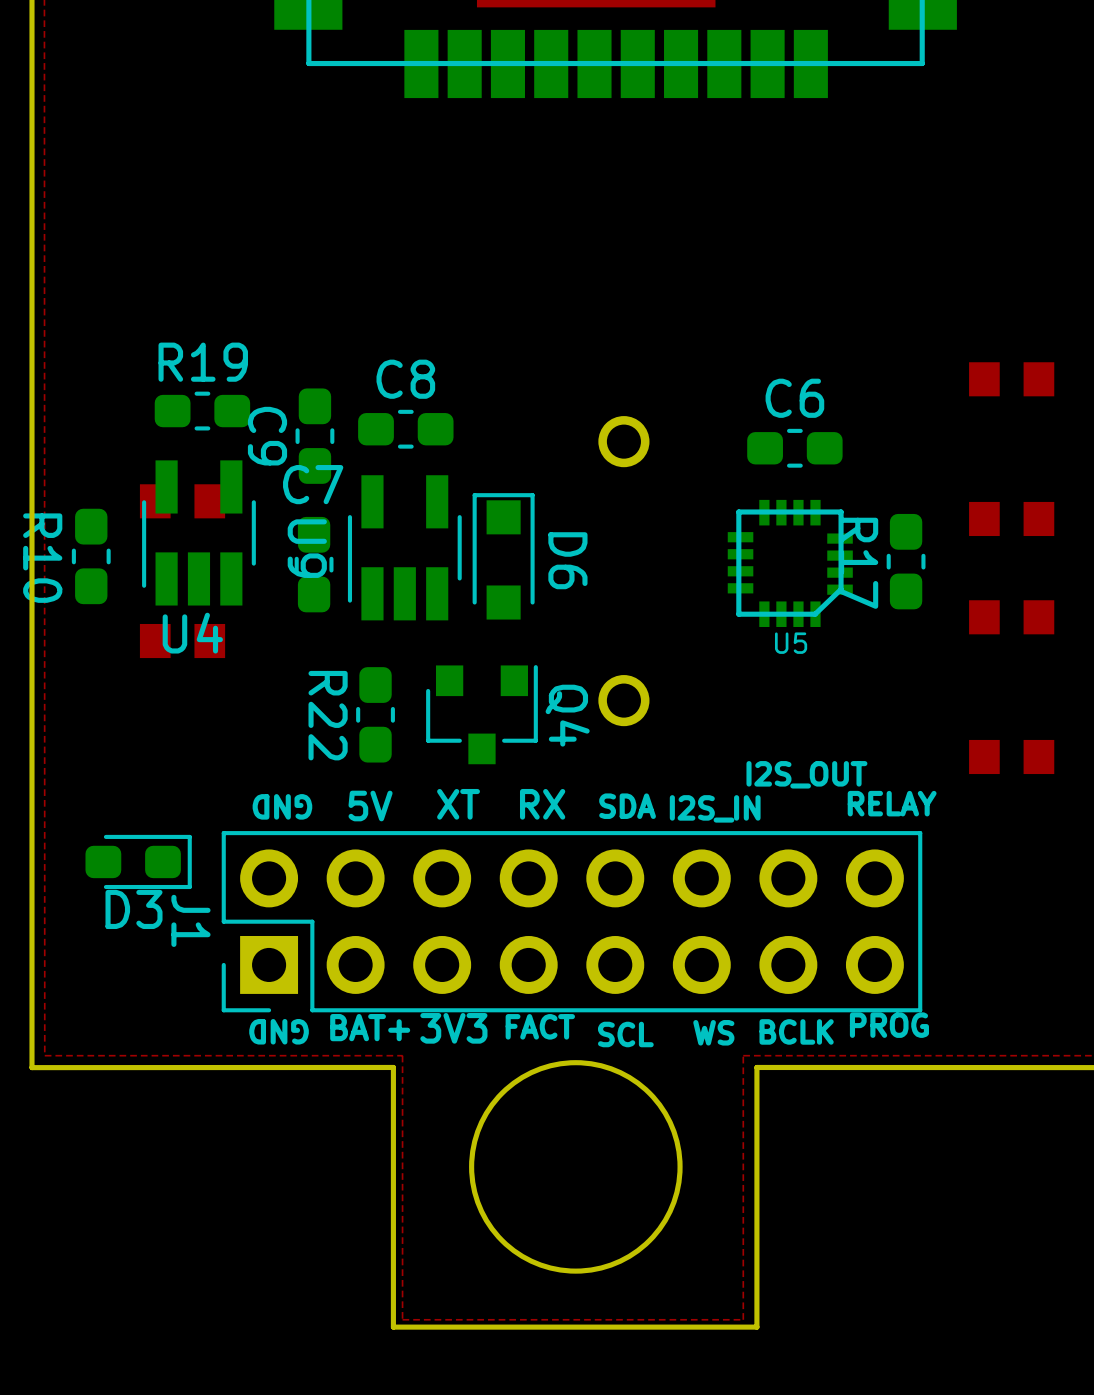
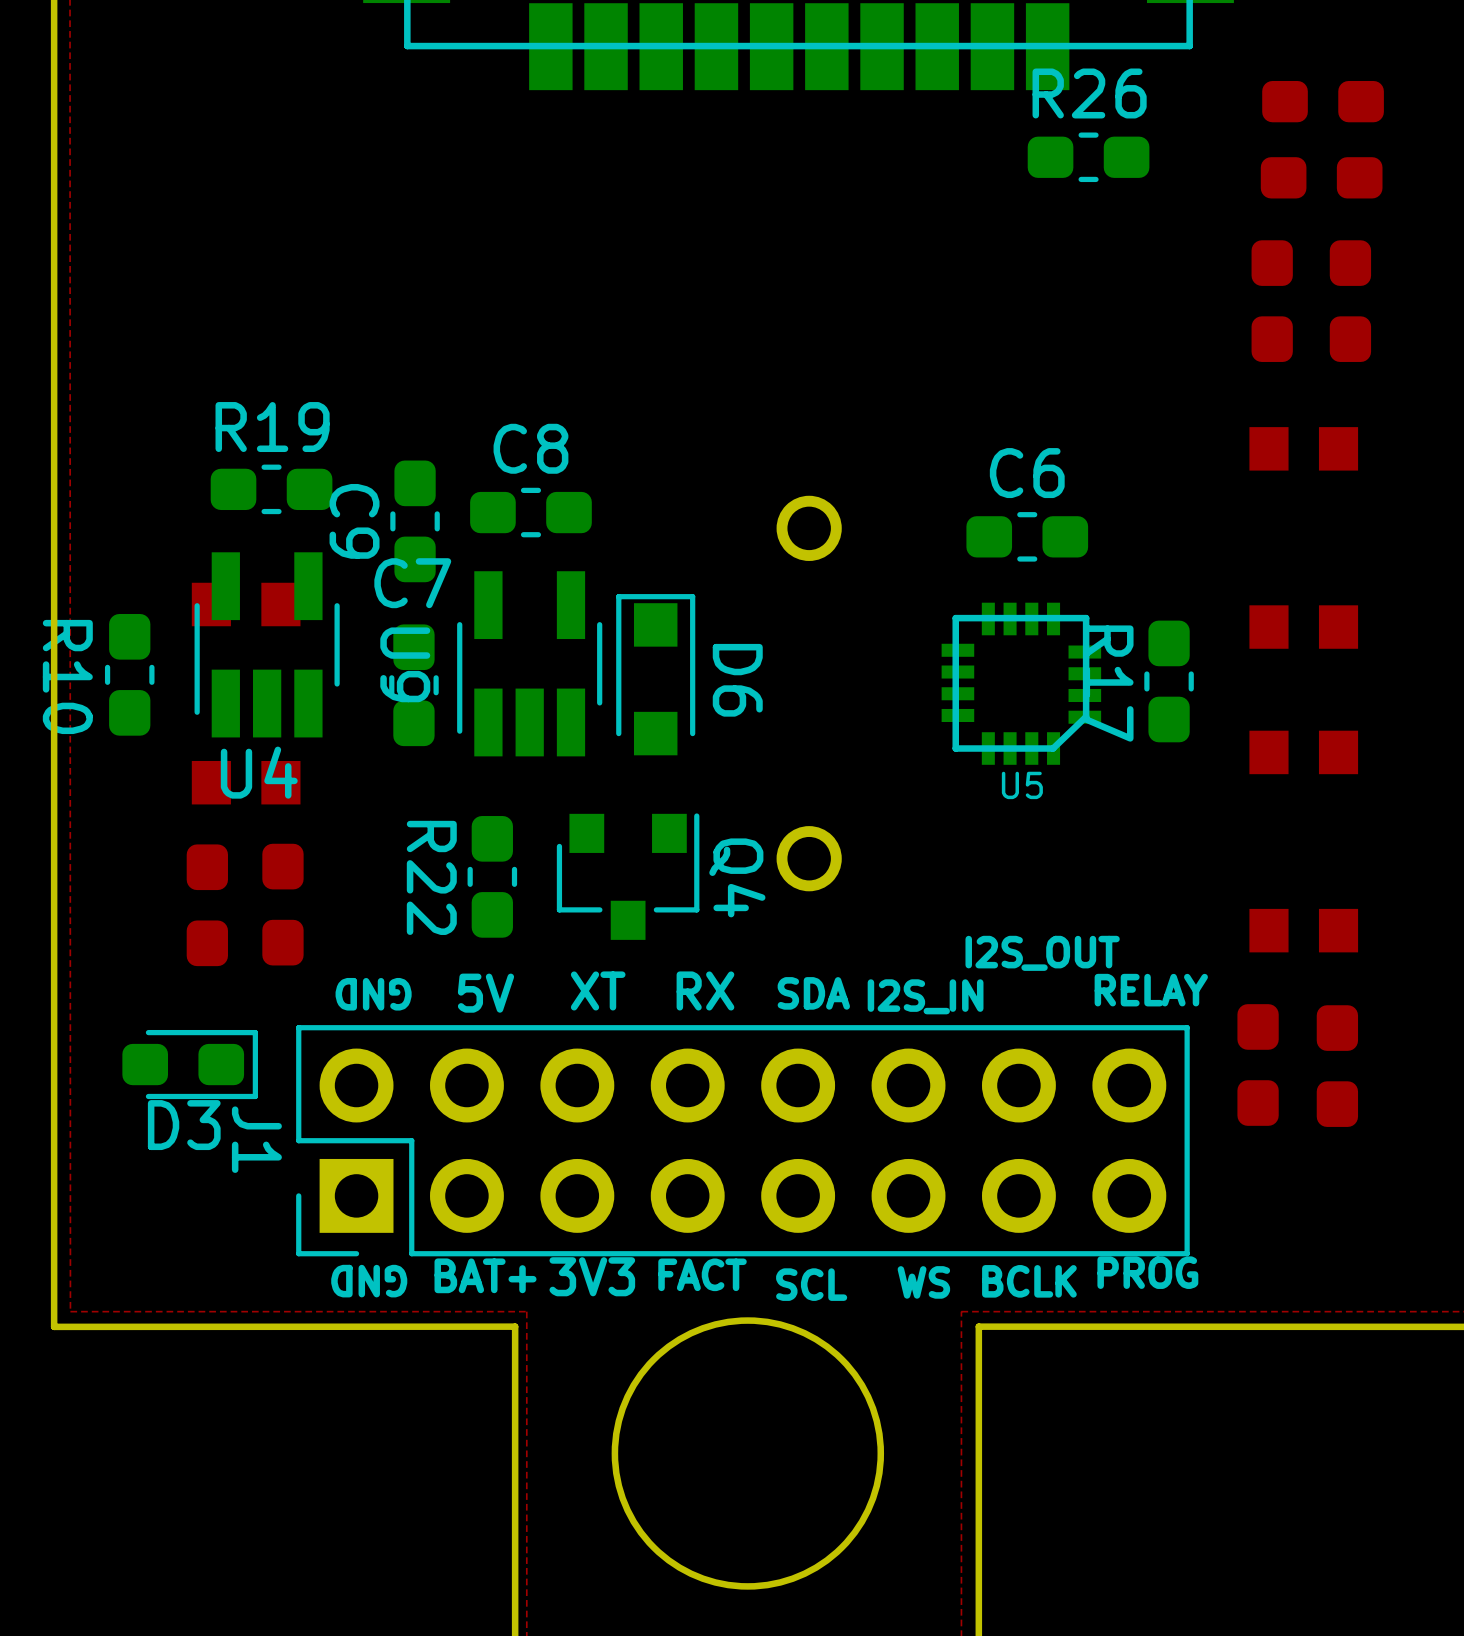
part: none -> (1323, 101)
R26: none -> (1088, 157)
part: none -> (1321, 177)
part: none -> (1272, 301)
part: none -> (1350, 301)
part: none -> (282, 904)
part: none -> (207, 905)
part: none -> (1258, 1065)
part: none -> (1337, 1066)

